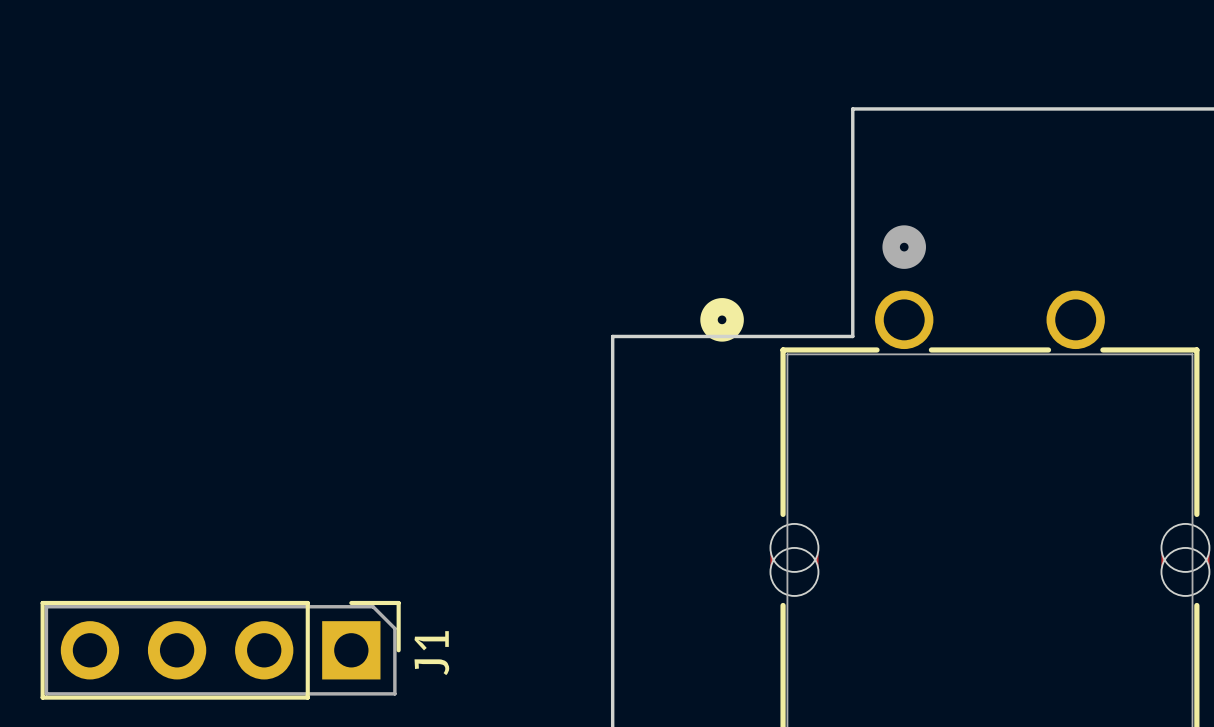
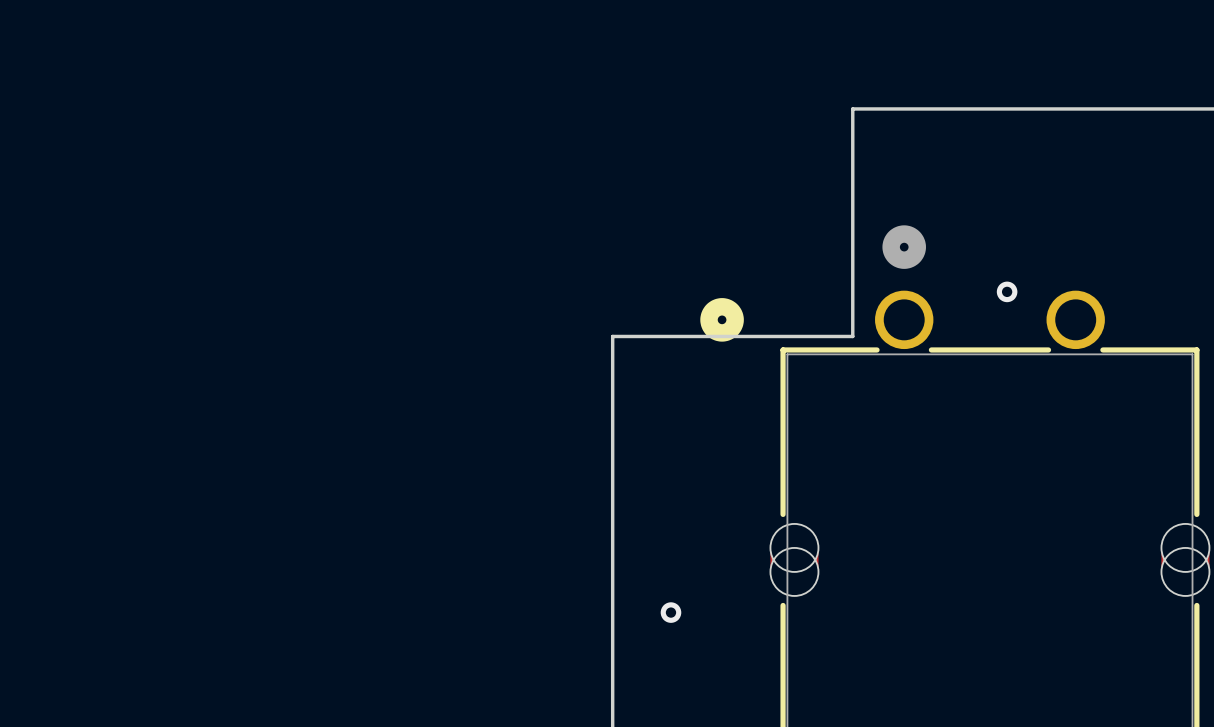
via: none -> (1007, 291)
via: none -> (670, 612)
J1: (220, 650) -> none

